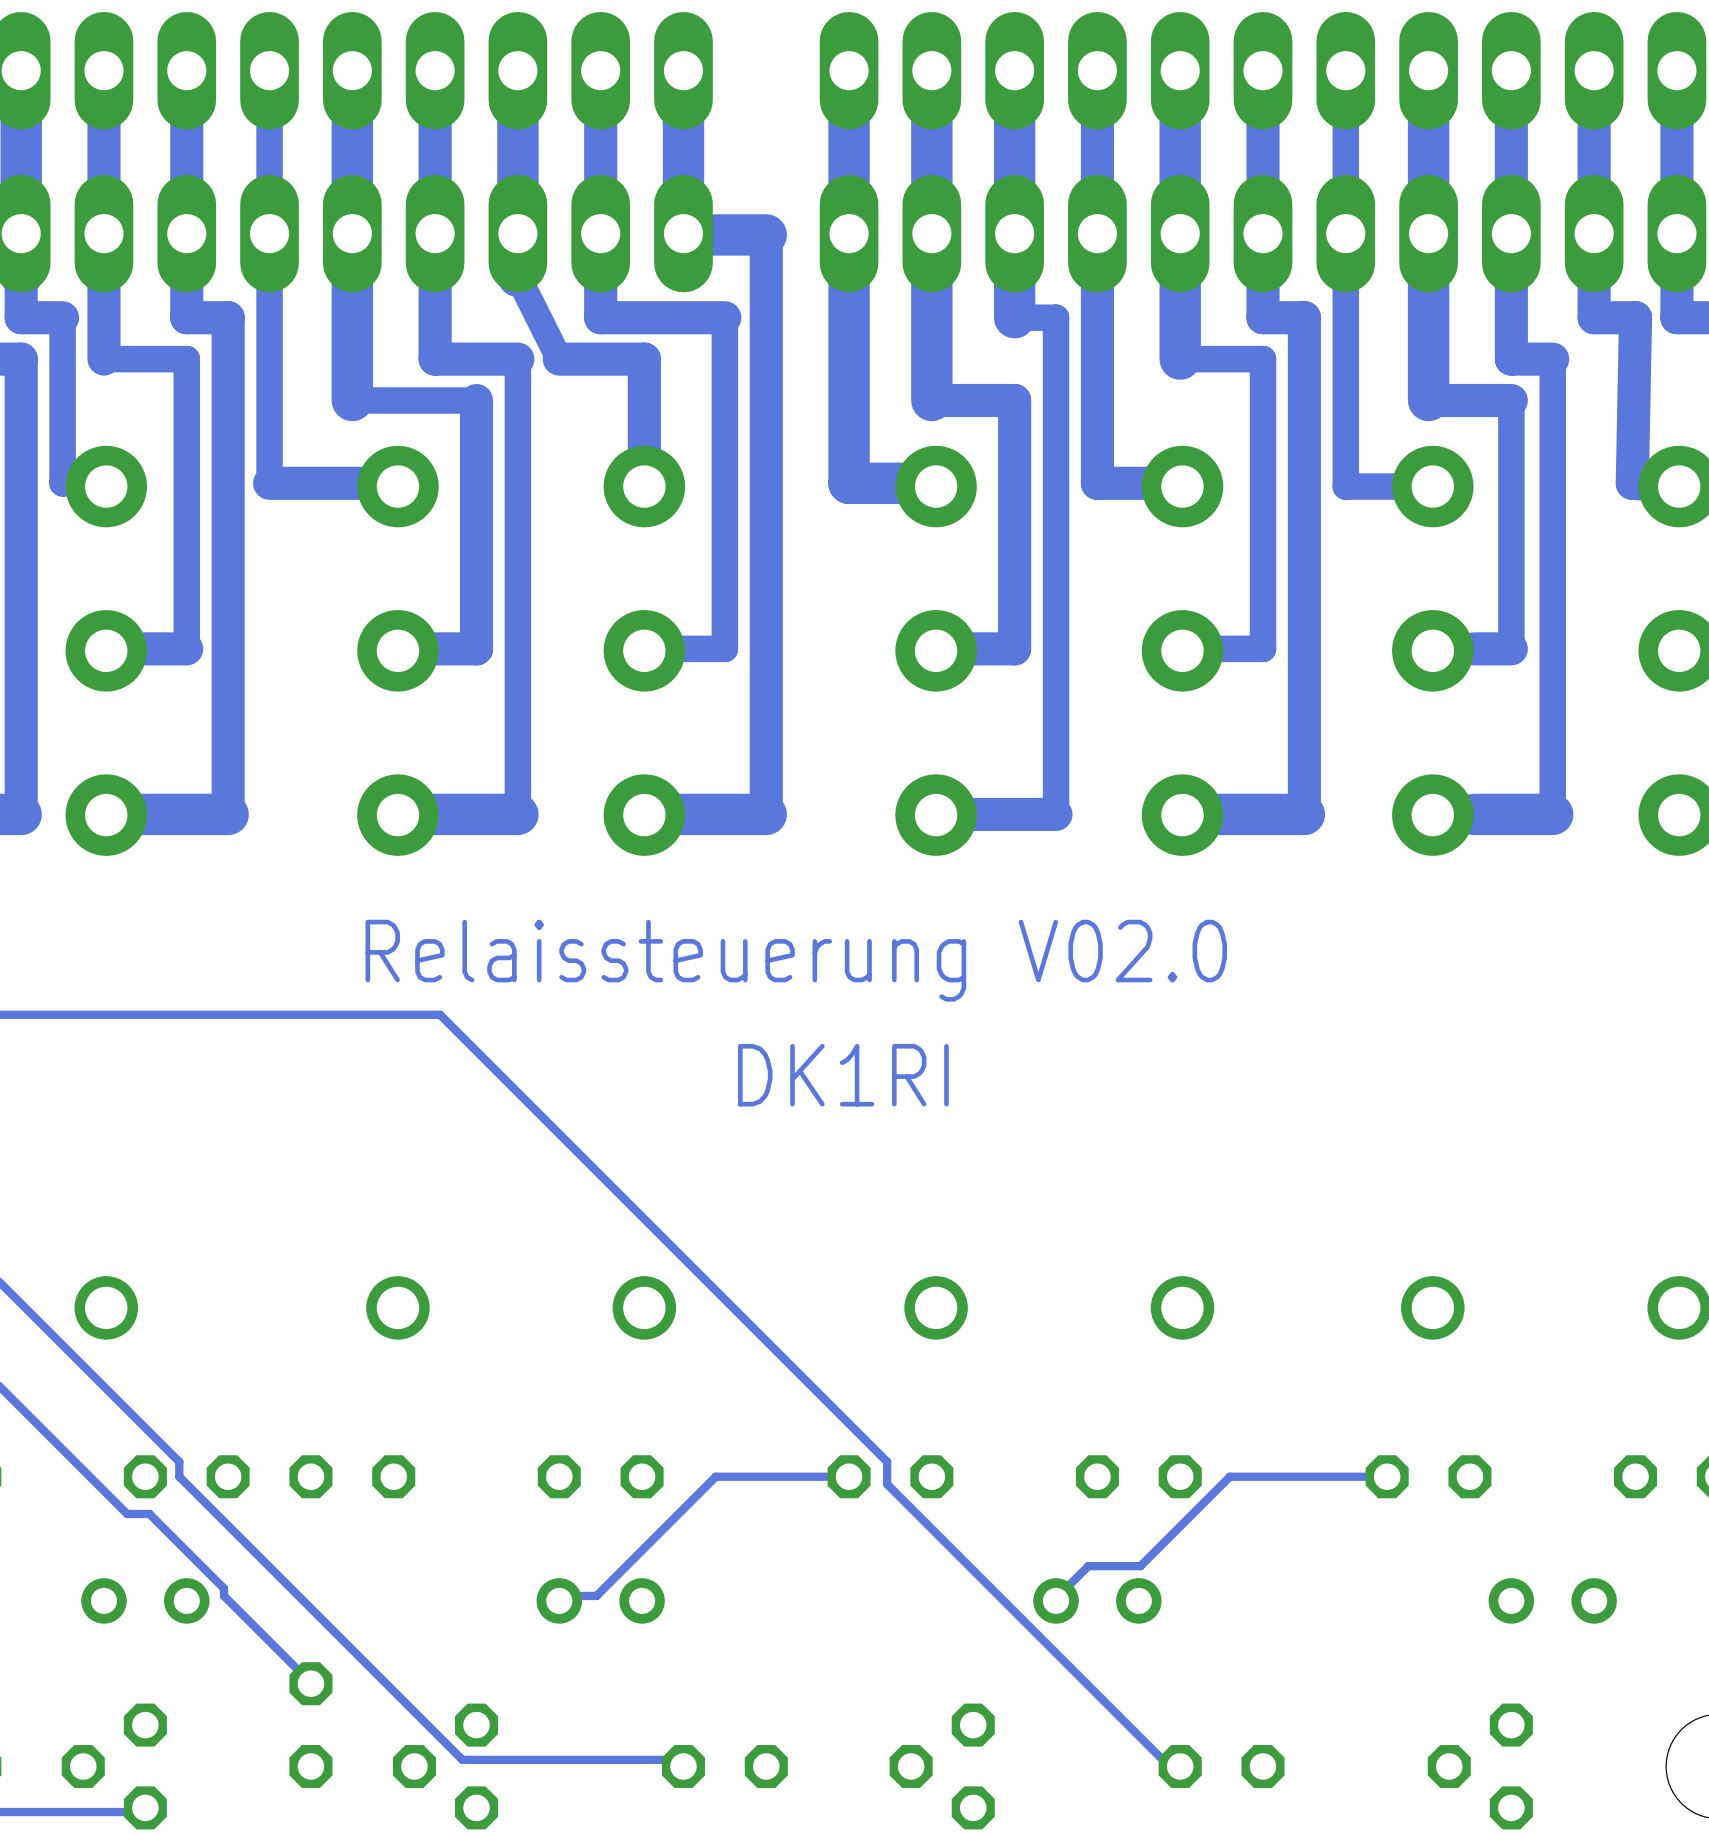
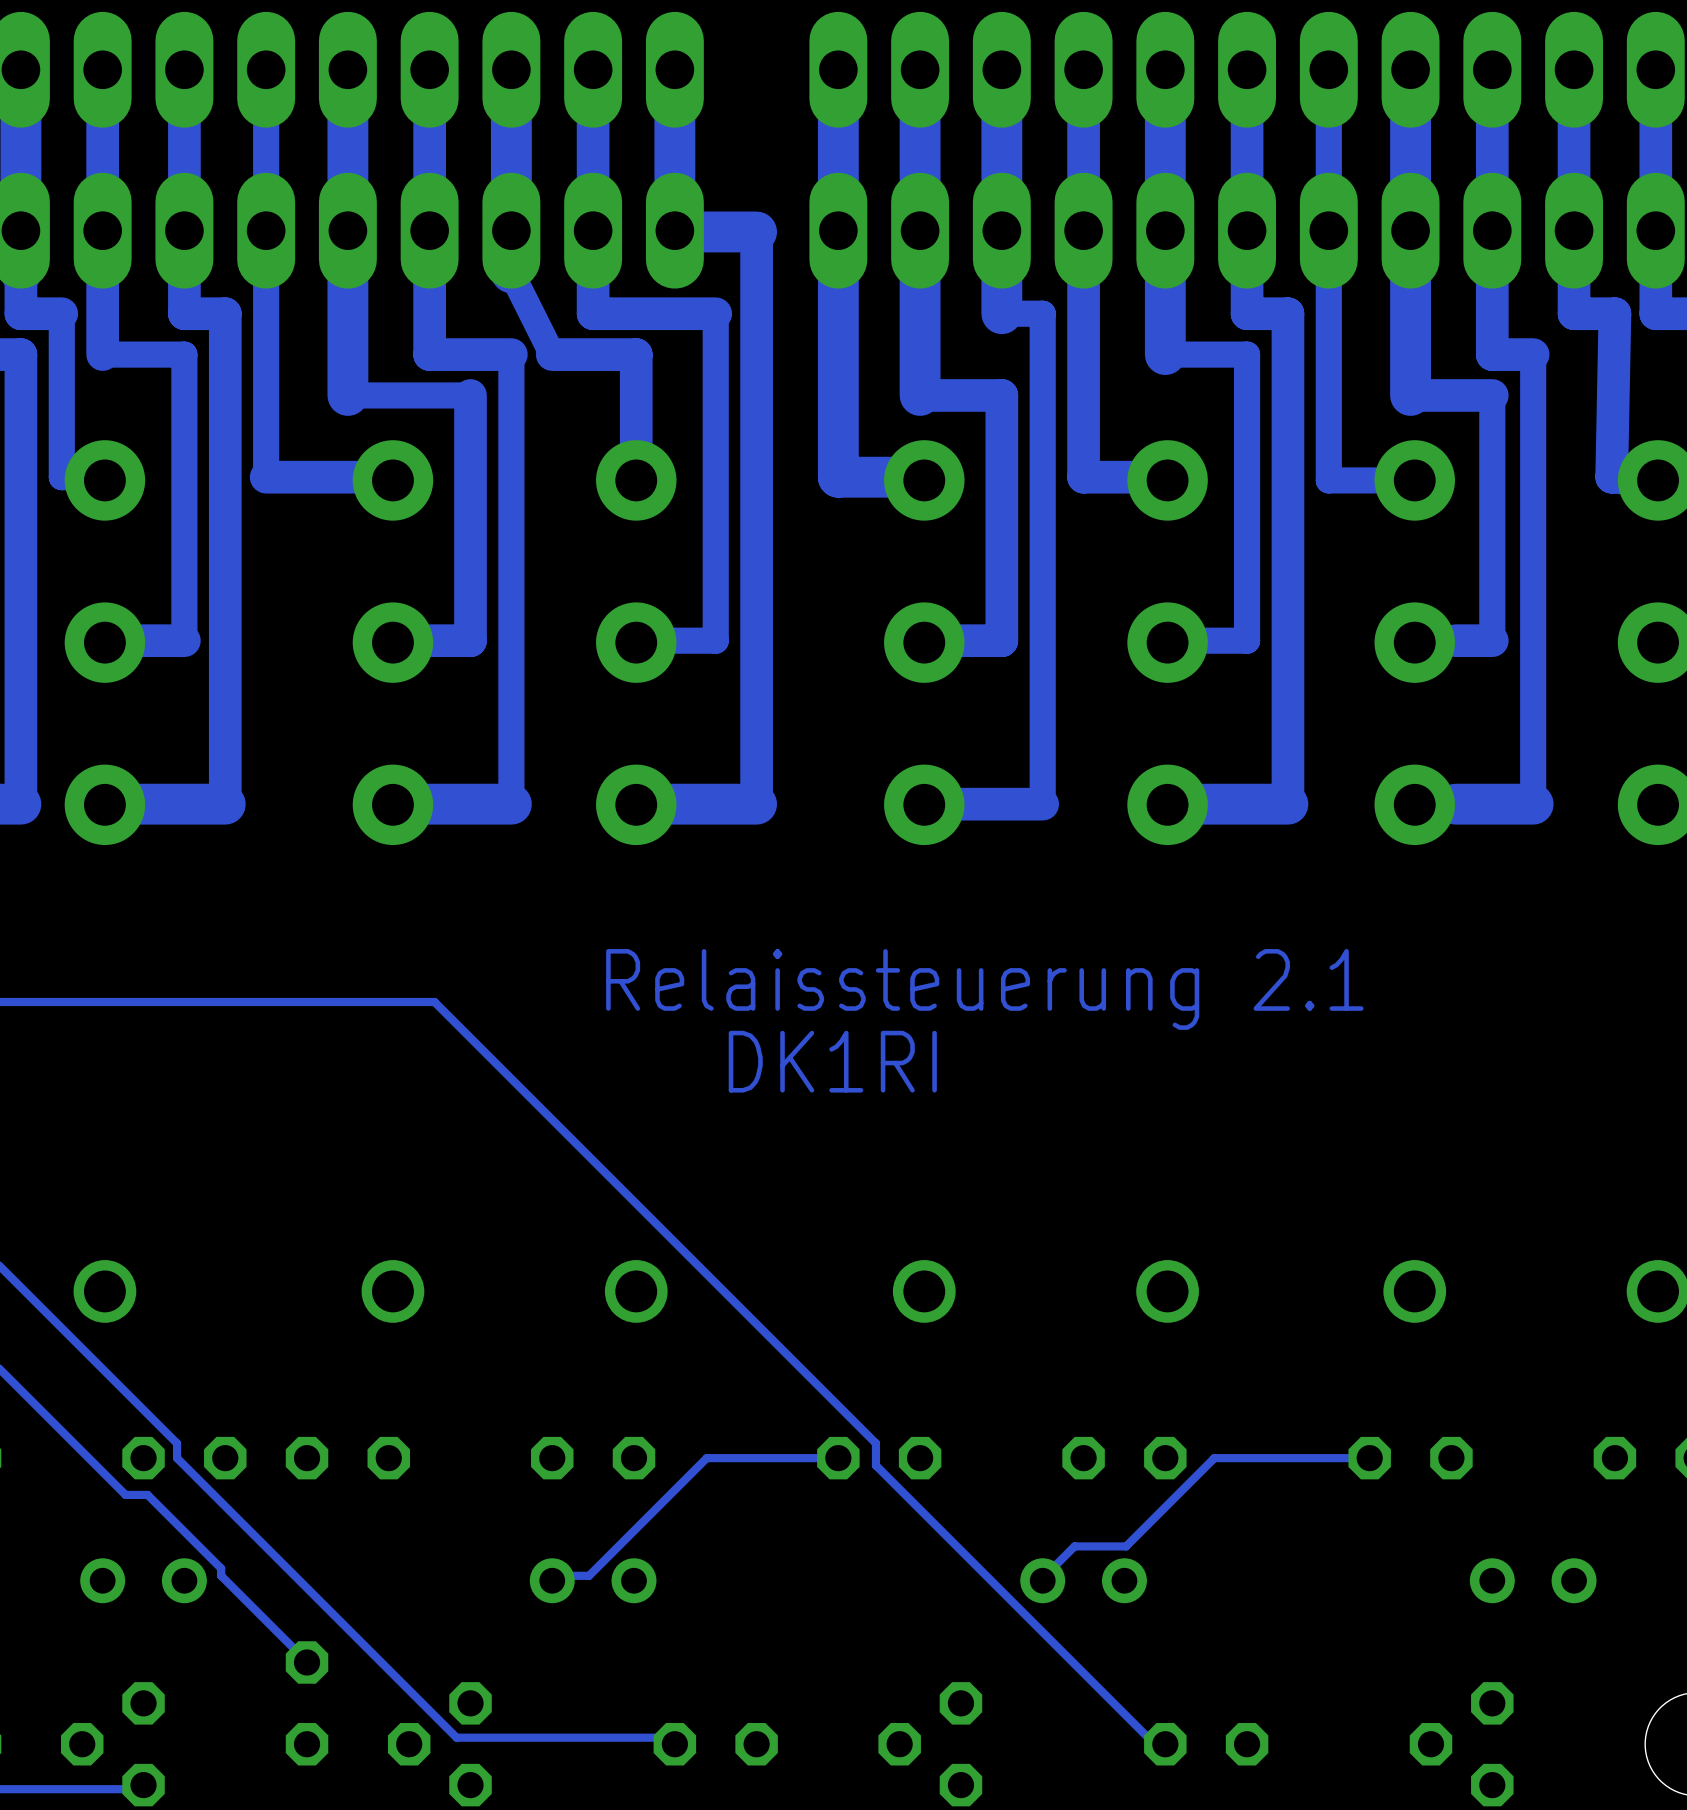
text: Relaissteuerung V02.0 (796, 960) -> Relaissteuerung 2.1 (984, 989)

